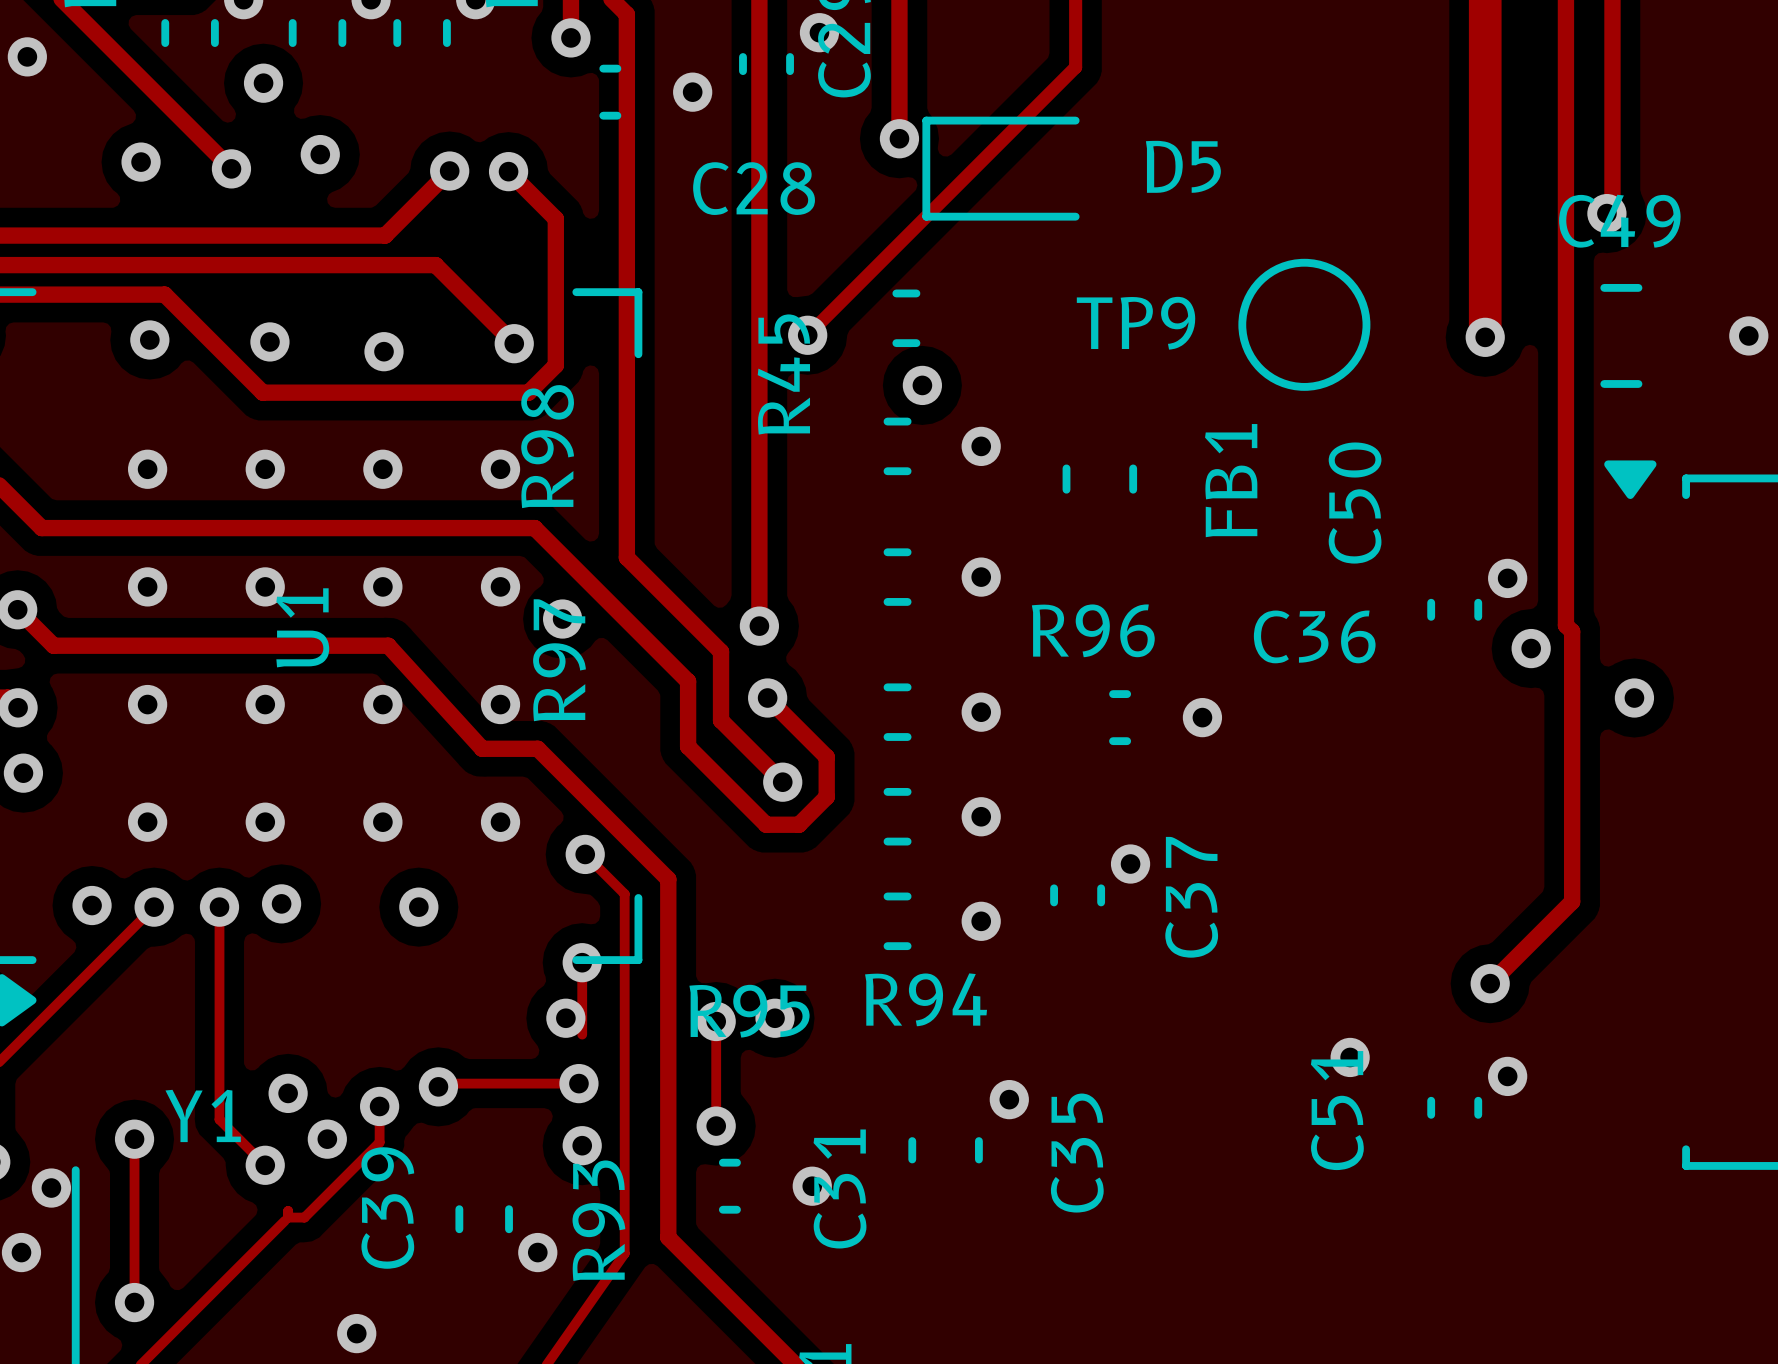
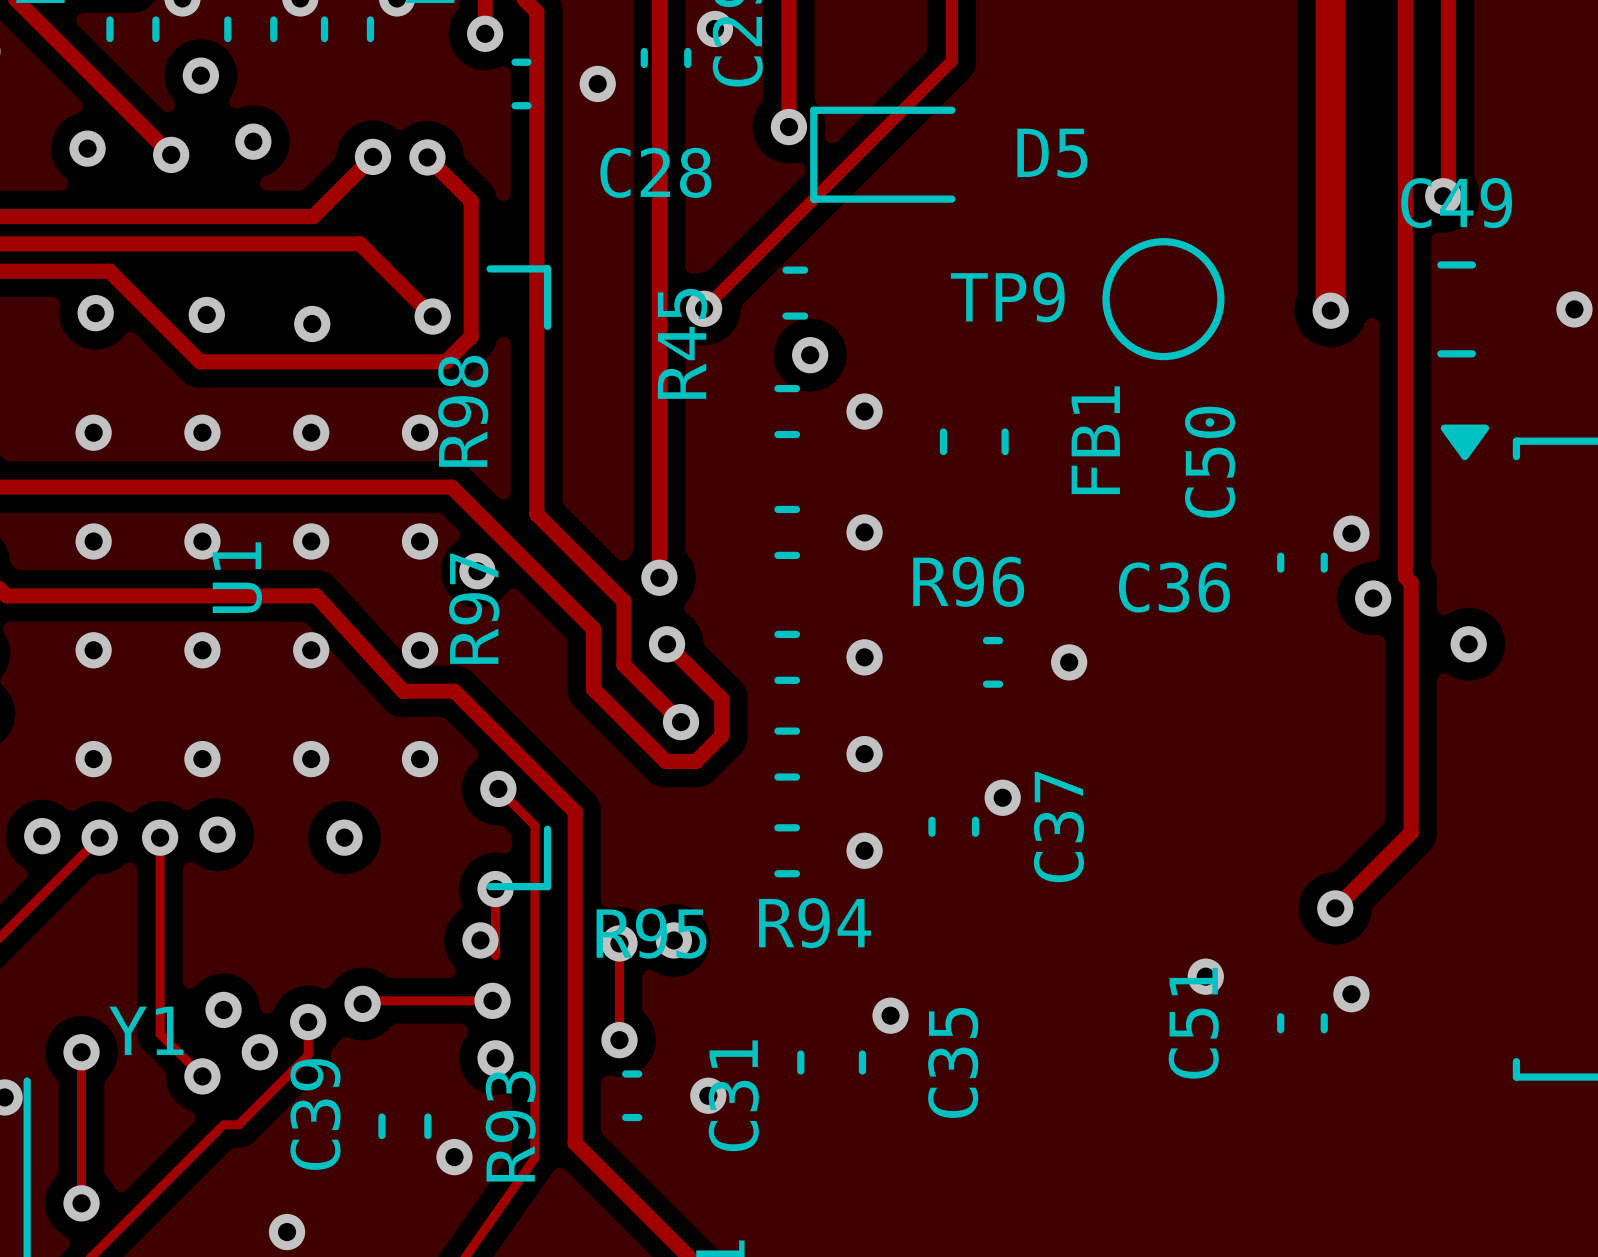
track: (288, 1211) (288, 1217) -> none

